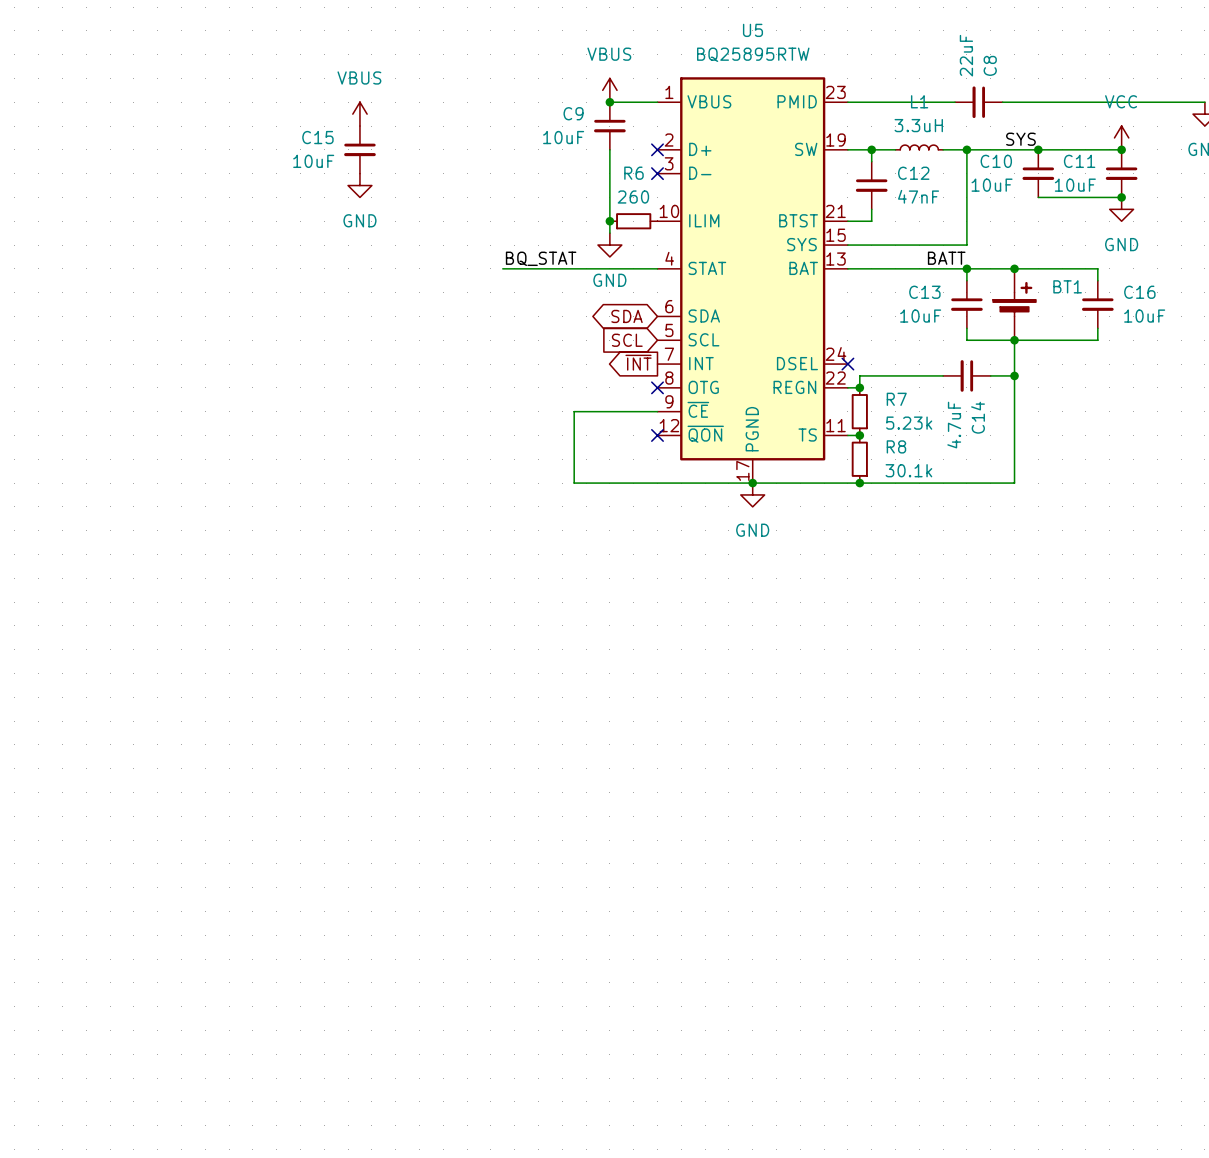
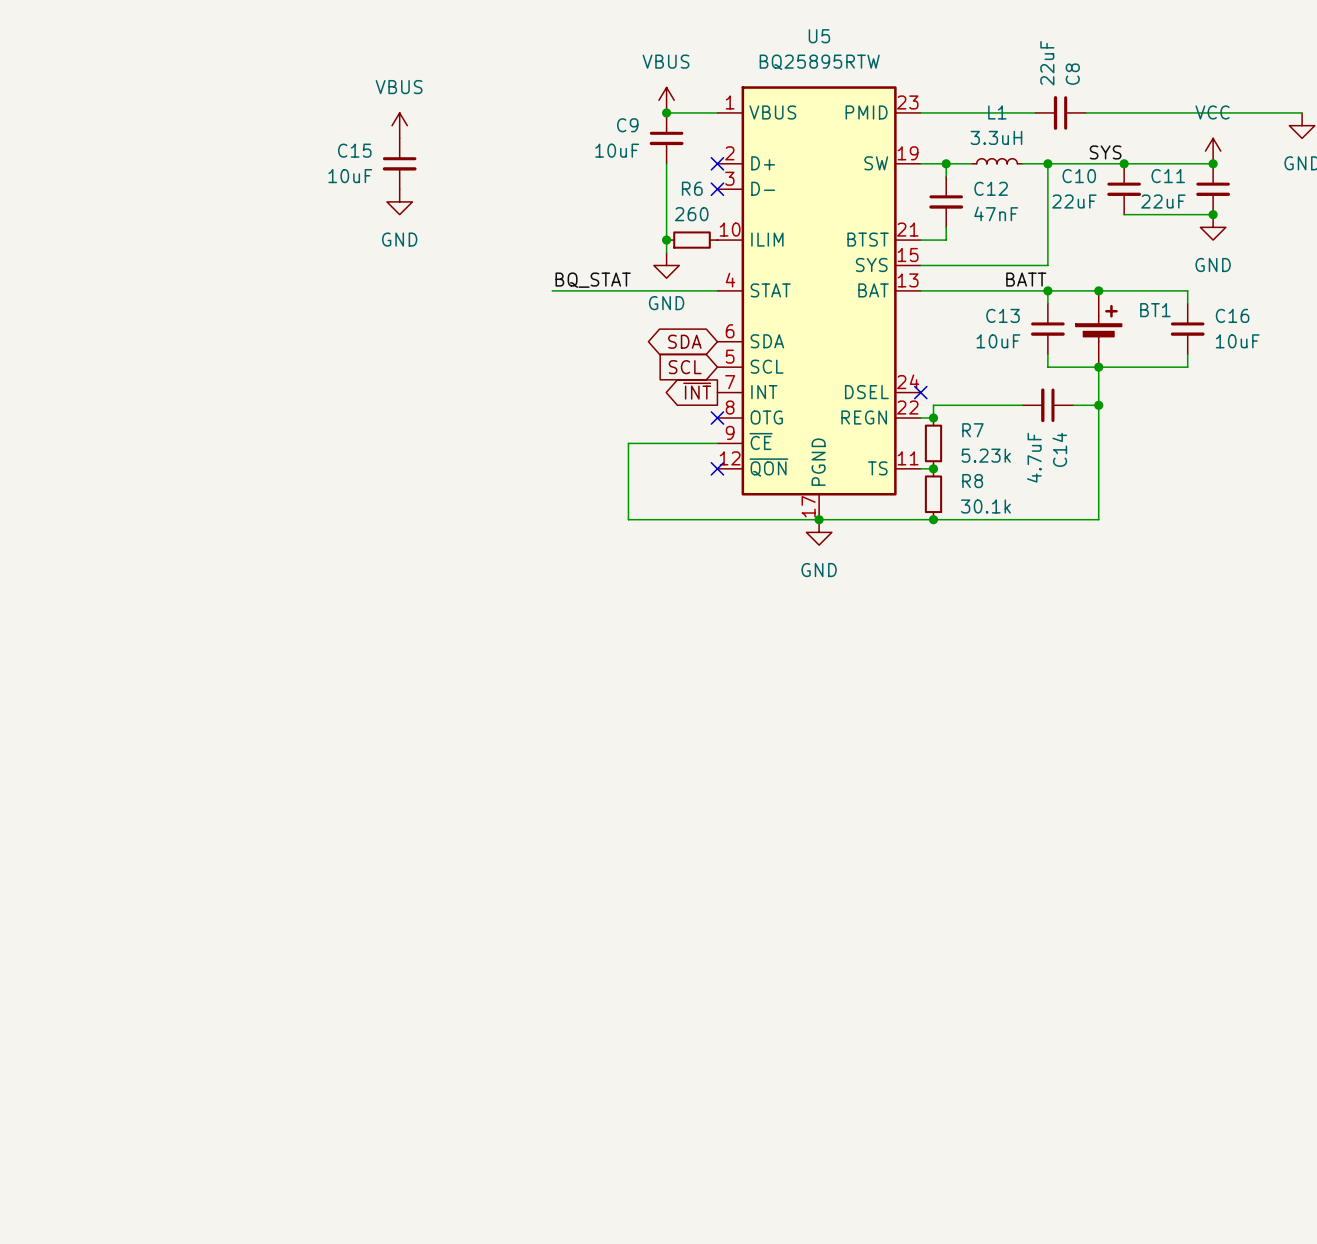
C10 value: 10uF (992, 185) -> 22uF (1074, 201)
C11 value: 10uF (1075, 185) -> 22uF (1163, 201)

